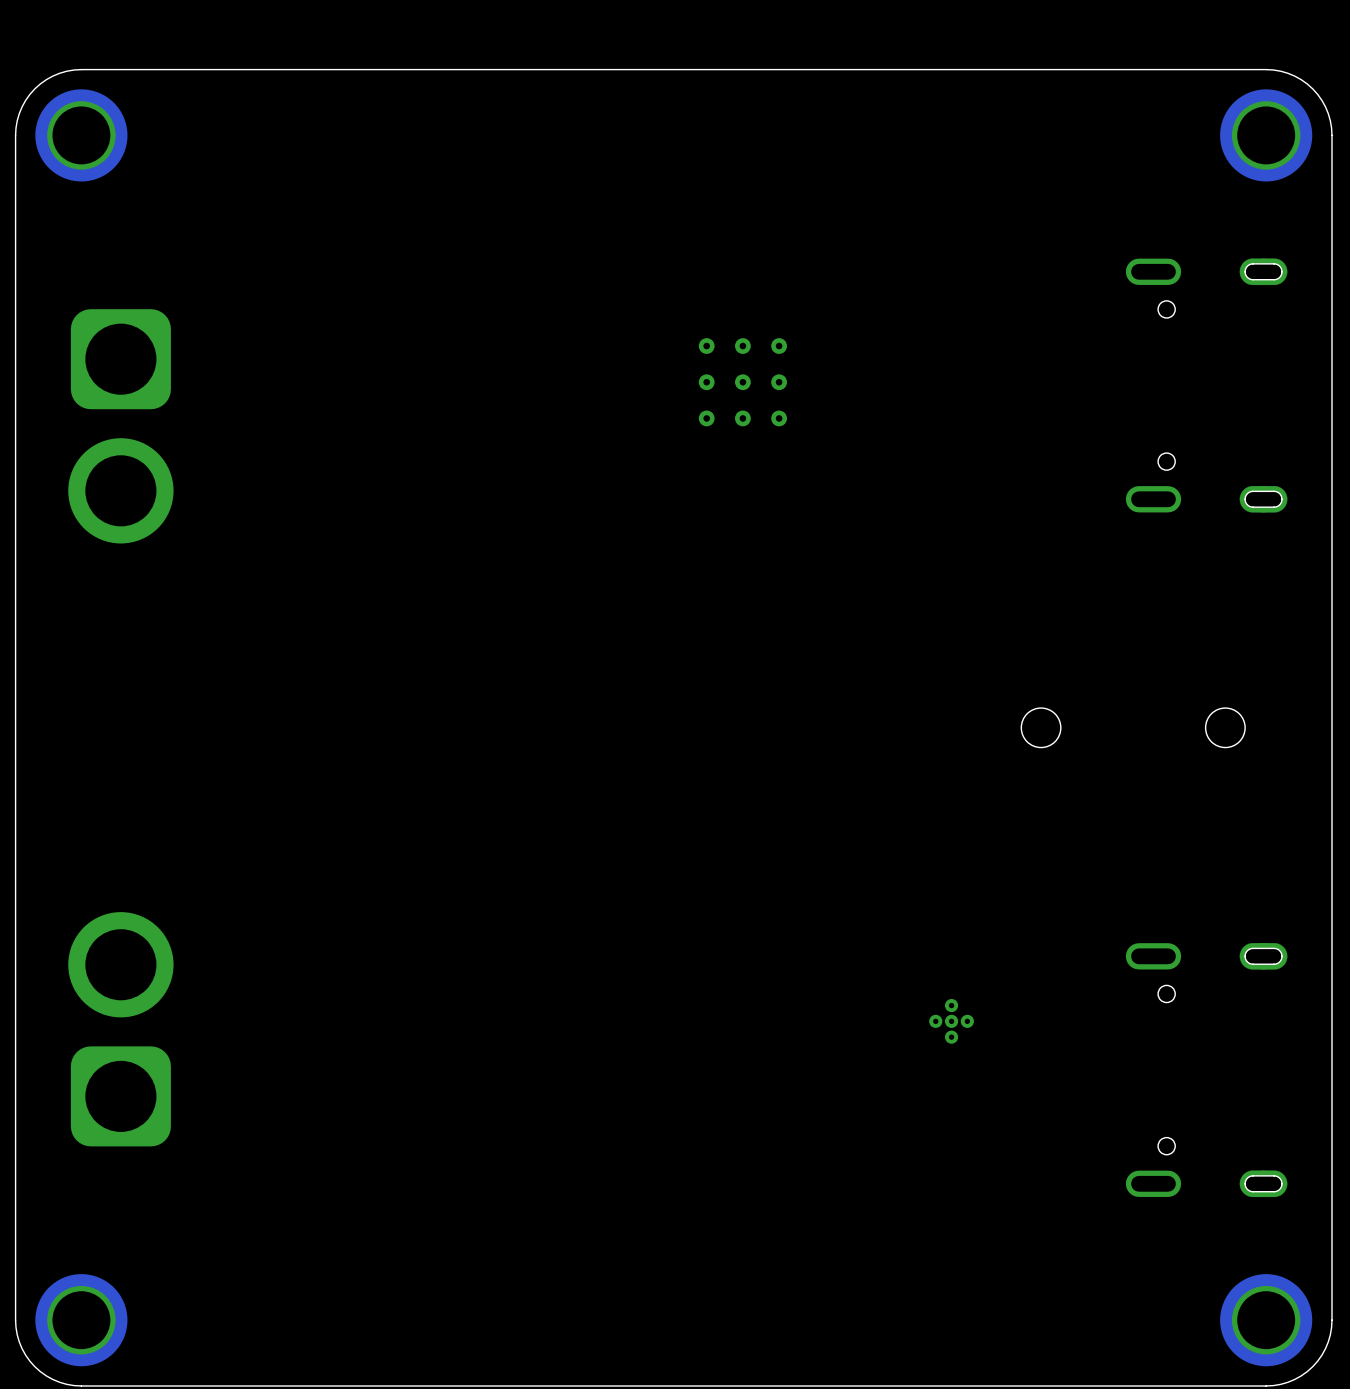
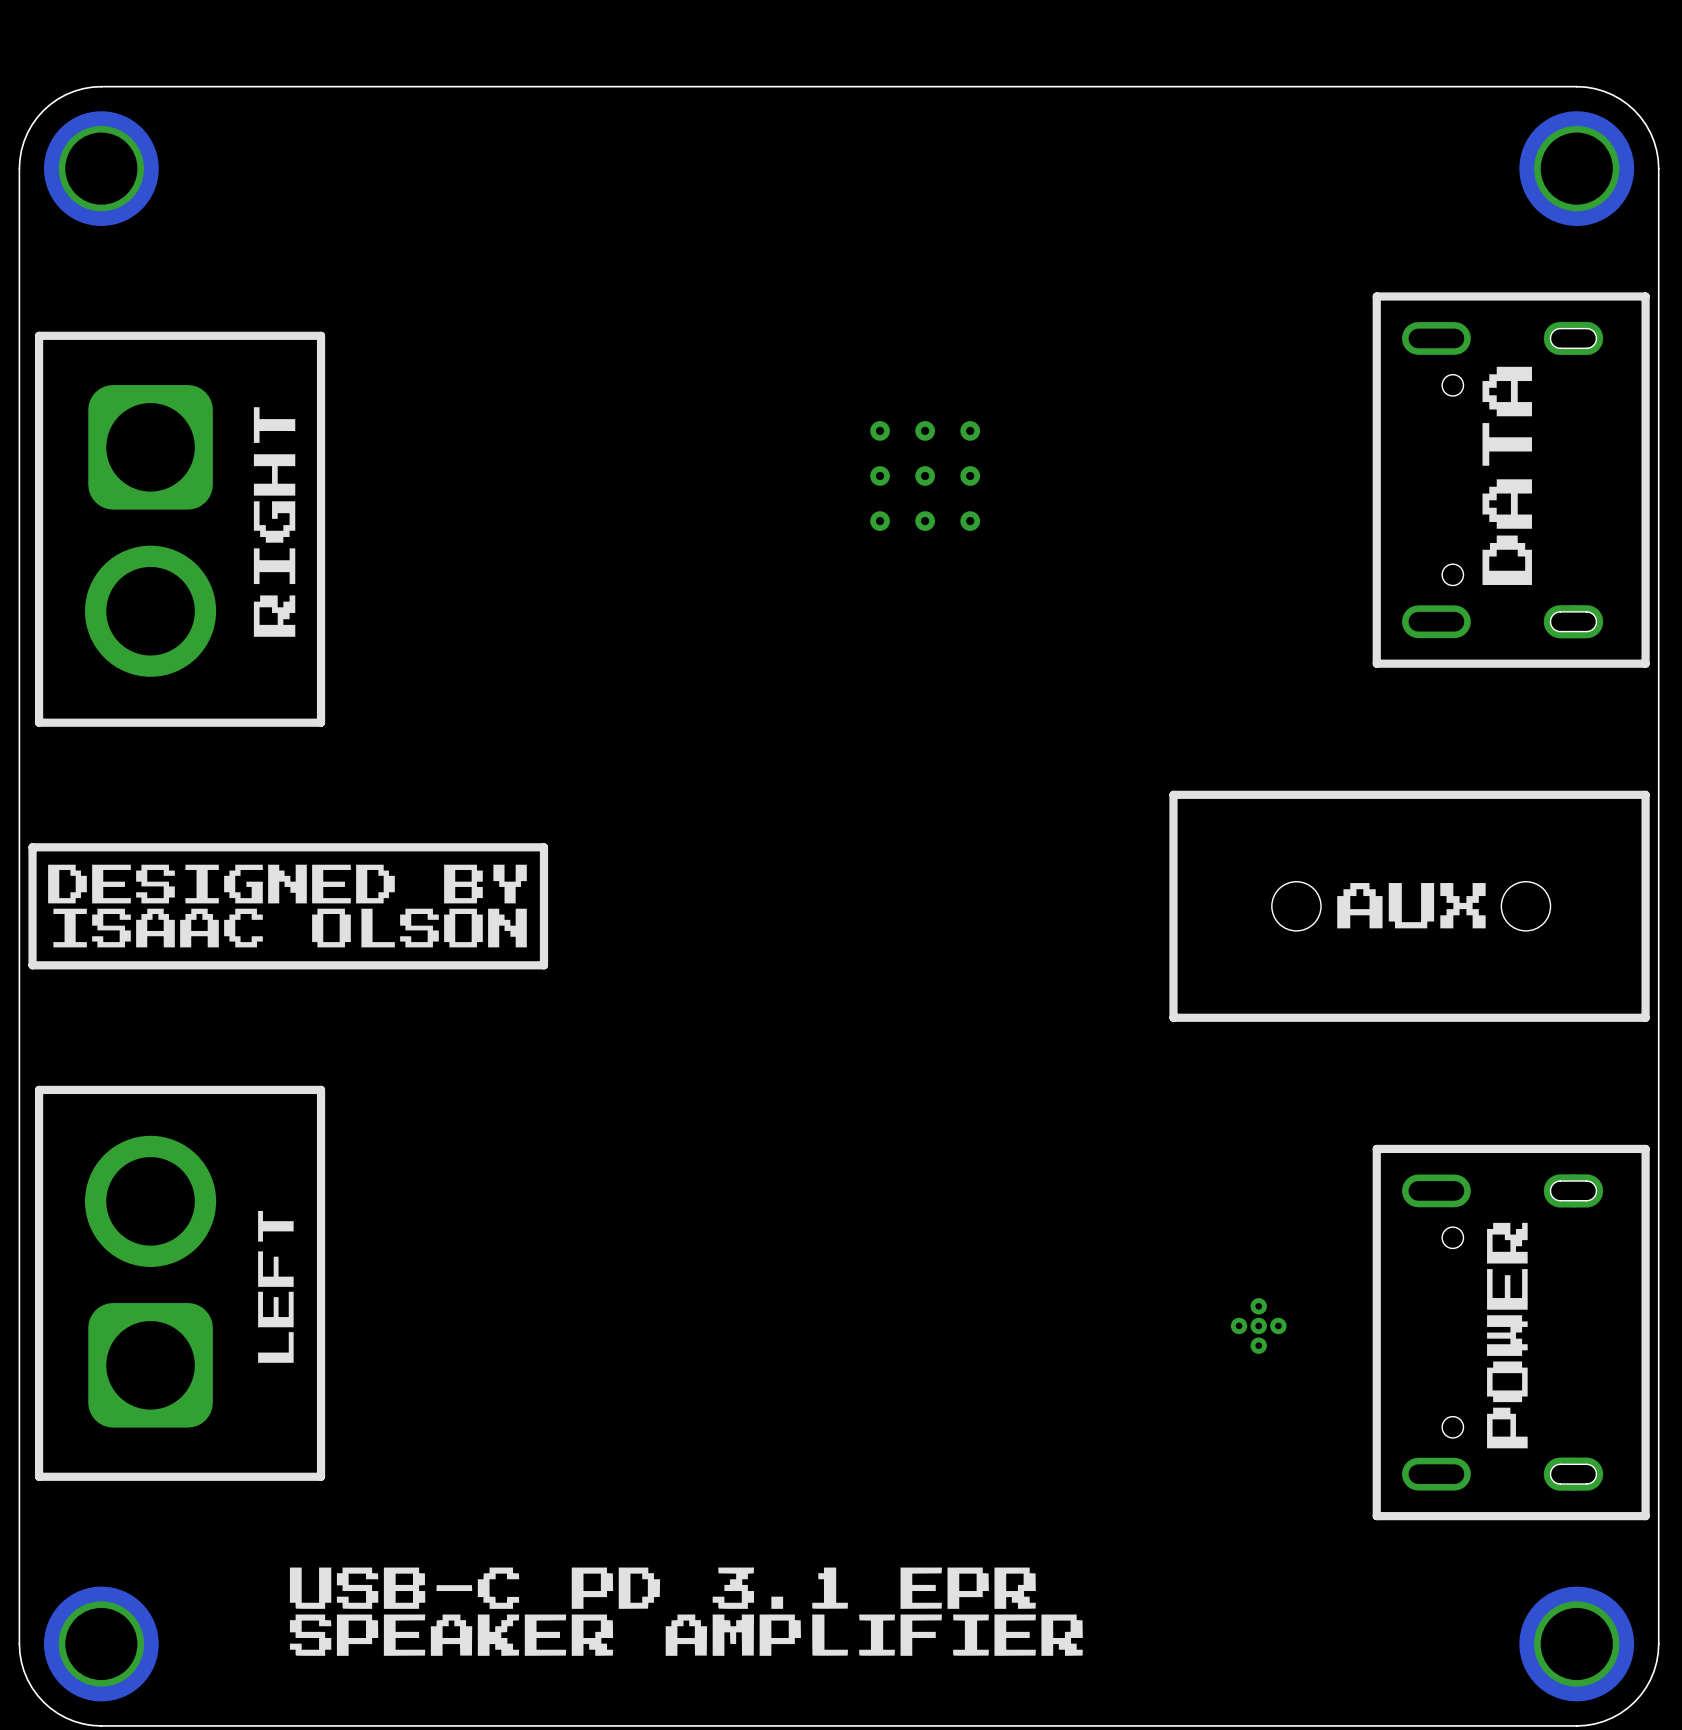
line: none -> (1645, 296) (1645, 663) (1376, 663) (1376, 296) (1645, 296)
line: none -> (321, 335) (321, 722) (39, 722) (39, 335) (321, 335)
drawing: none -> [1482, 366, 1532, 586]
drawing: none -> [253, 407, 296, 637]
line: none -> (1645, 794) (1645, 1017) (1173, 1017) (1173, 794) (1645, 794)
line: none -> (543, 847) (32, 847) (32, 965) (543, 965) (543, 847)
drawing: none -> [48, 864, 527, 948]
drawing: none -> [1337, 883, 1486, 929]
line: none -> (321, 1089) (39, 1089) (39, 1476) (321, 1476) (321, 1089)
line: none -> (1645, 1148) (1376, 1148) (1376, 1516) (1645, 1516) (1645, 1148)
drawing: none -> [258, 1210, 294, 1363]
drawing: none -> [1487, 1222, 1528, 1449]
part position: (951, 1021) -> (1258, 1325)
drawing: none -> [289, 1567, 1083, 1656]

